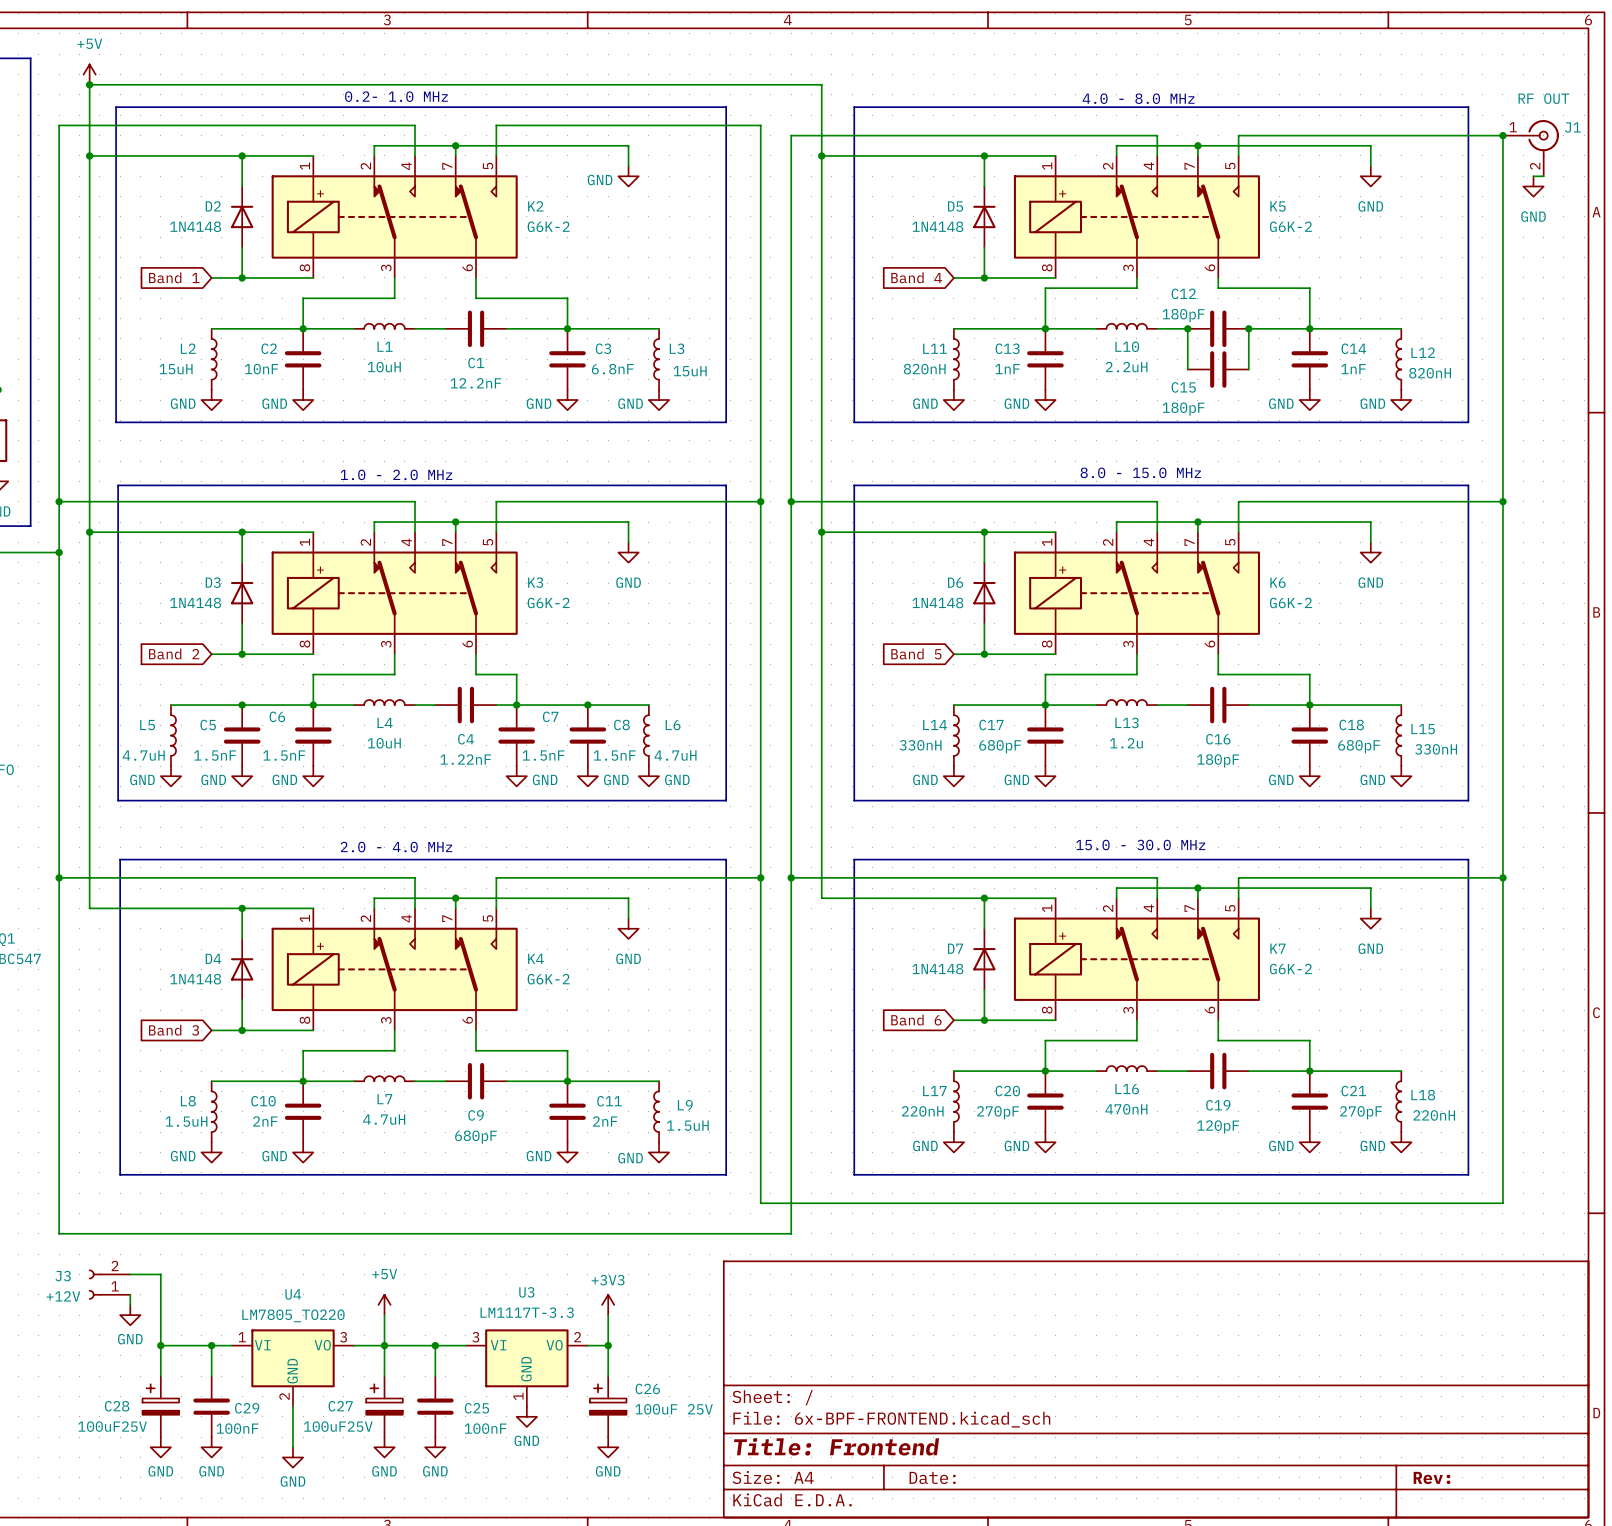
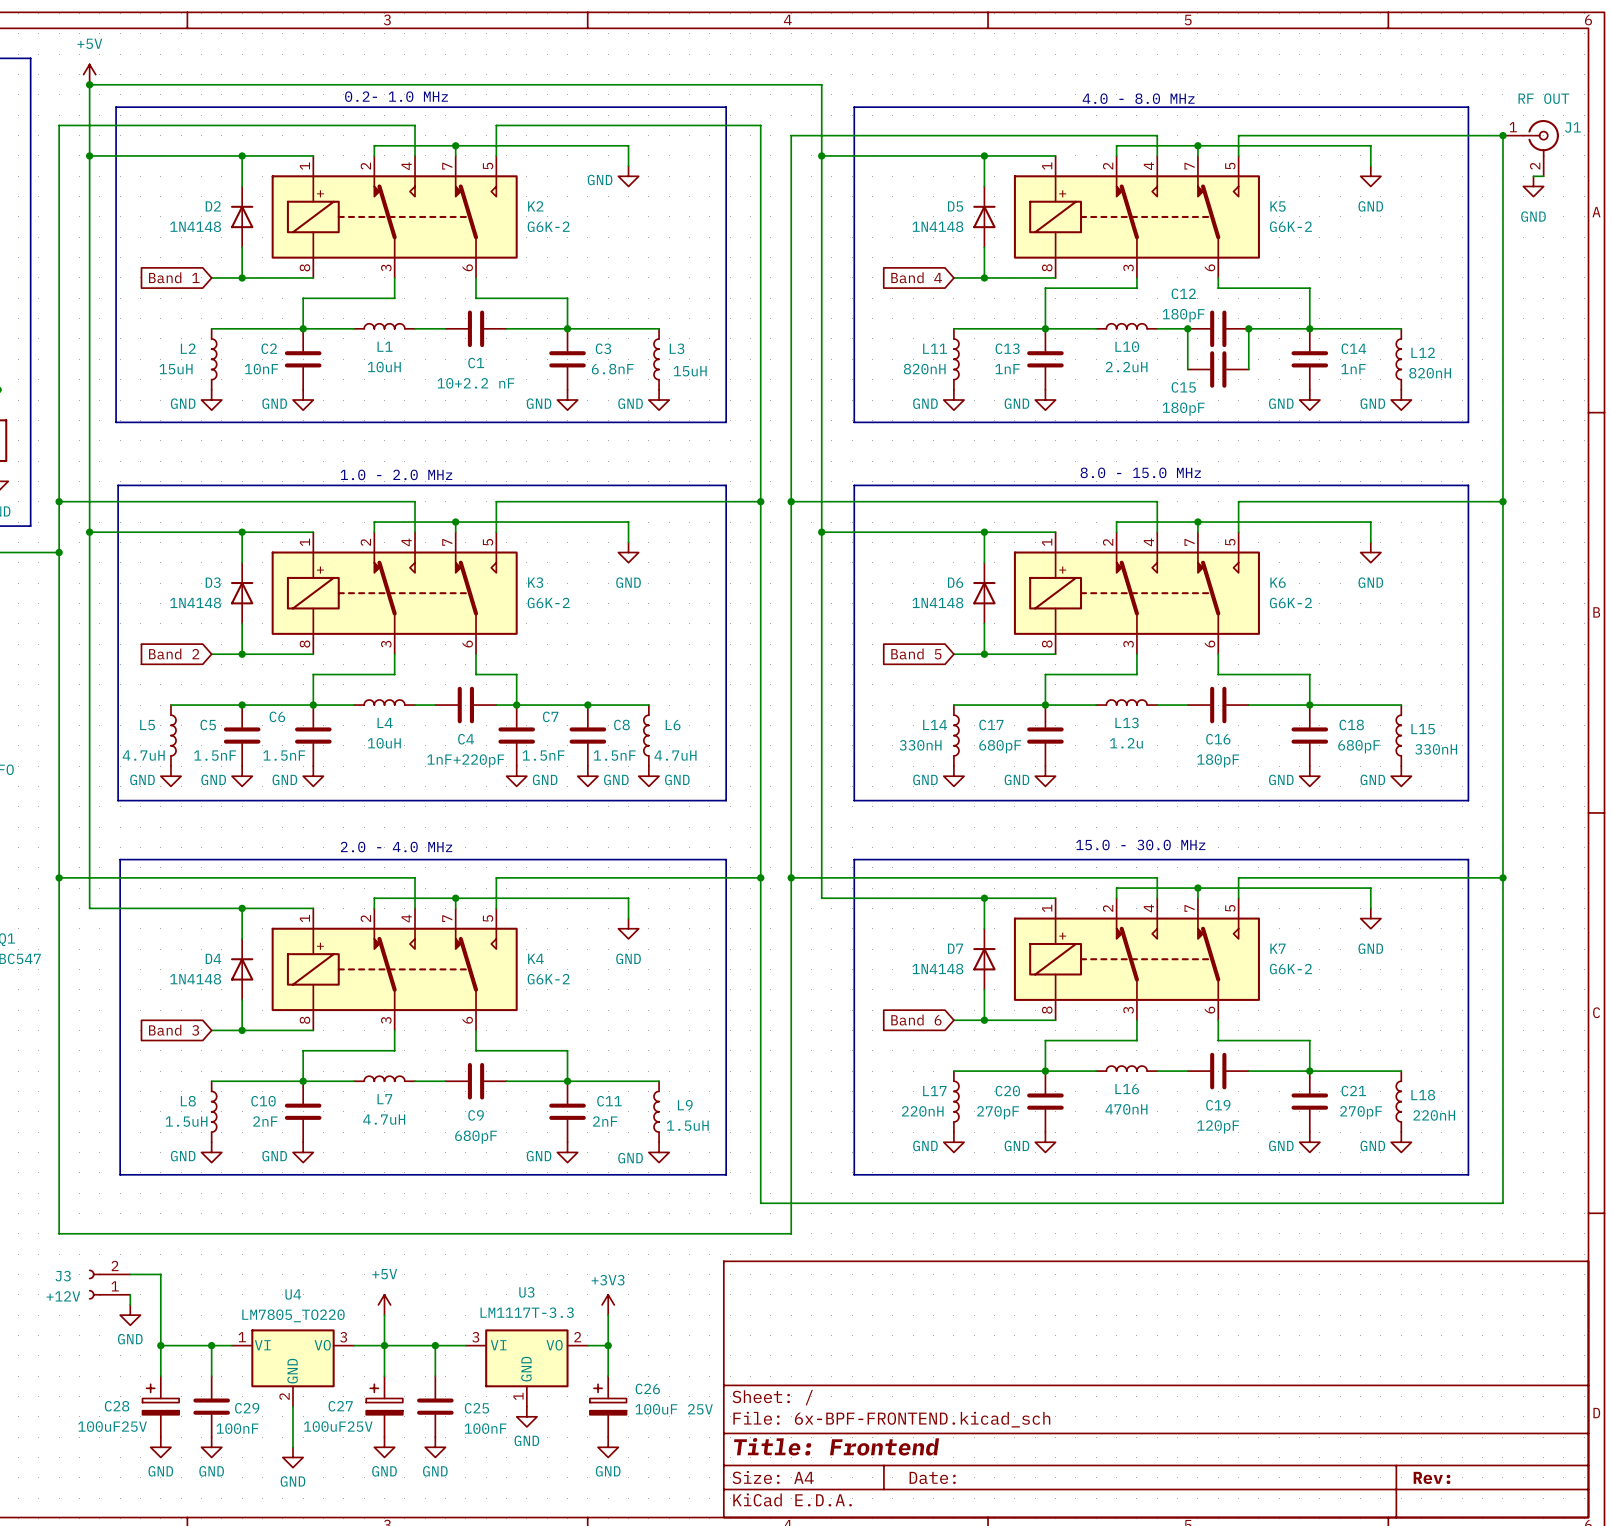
C1 value: 12.2nF (475, 383) -> 10+2.2 nF (475, 383)
C4 value: 1.22nF (465, 759) -> 1nF+220pF (465, 760)

